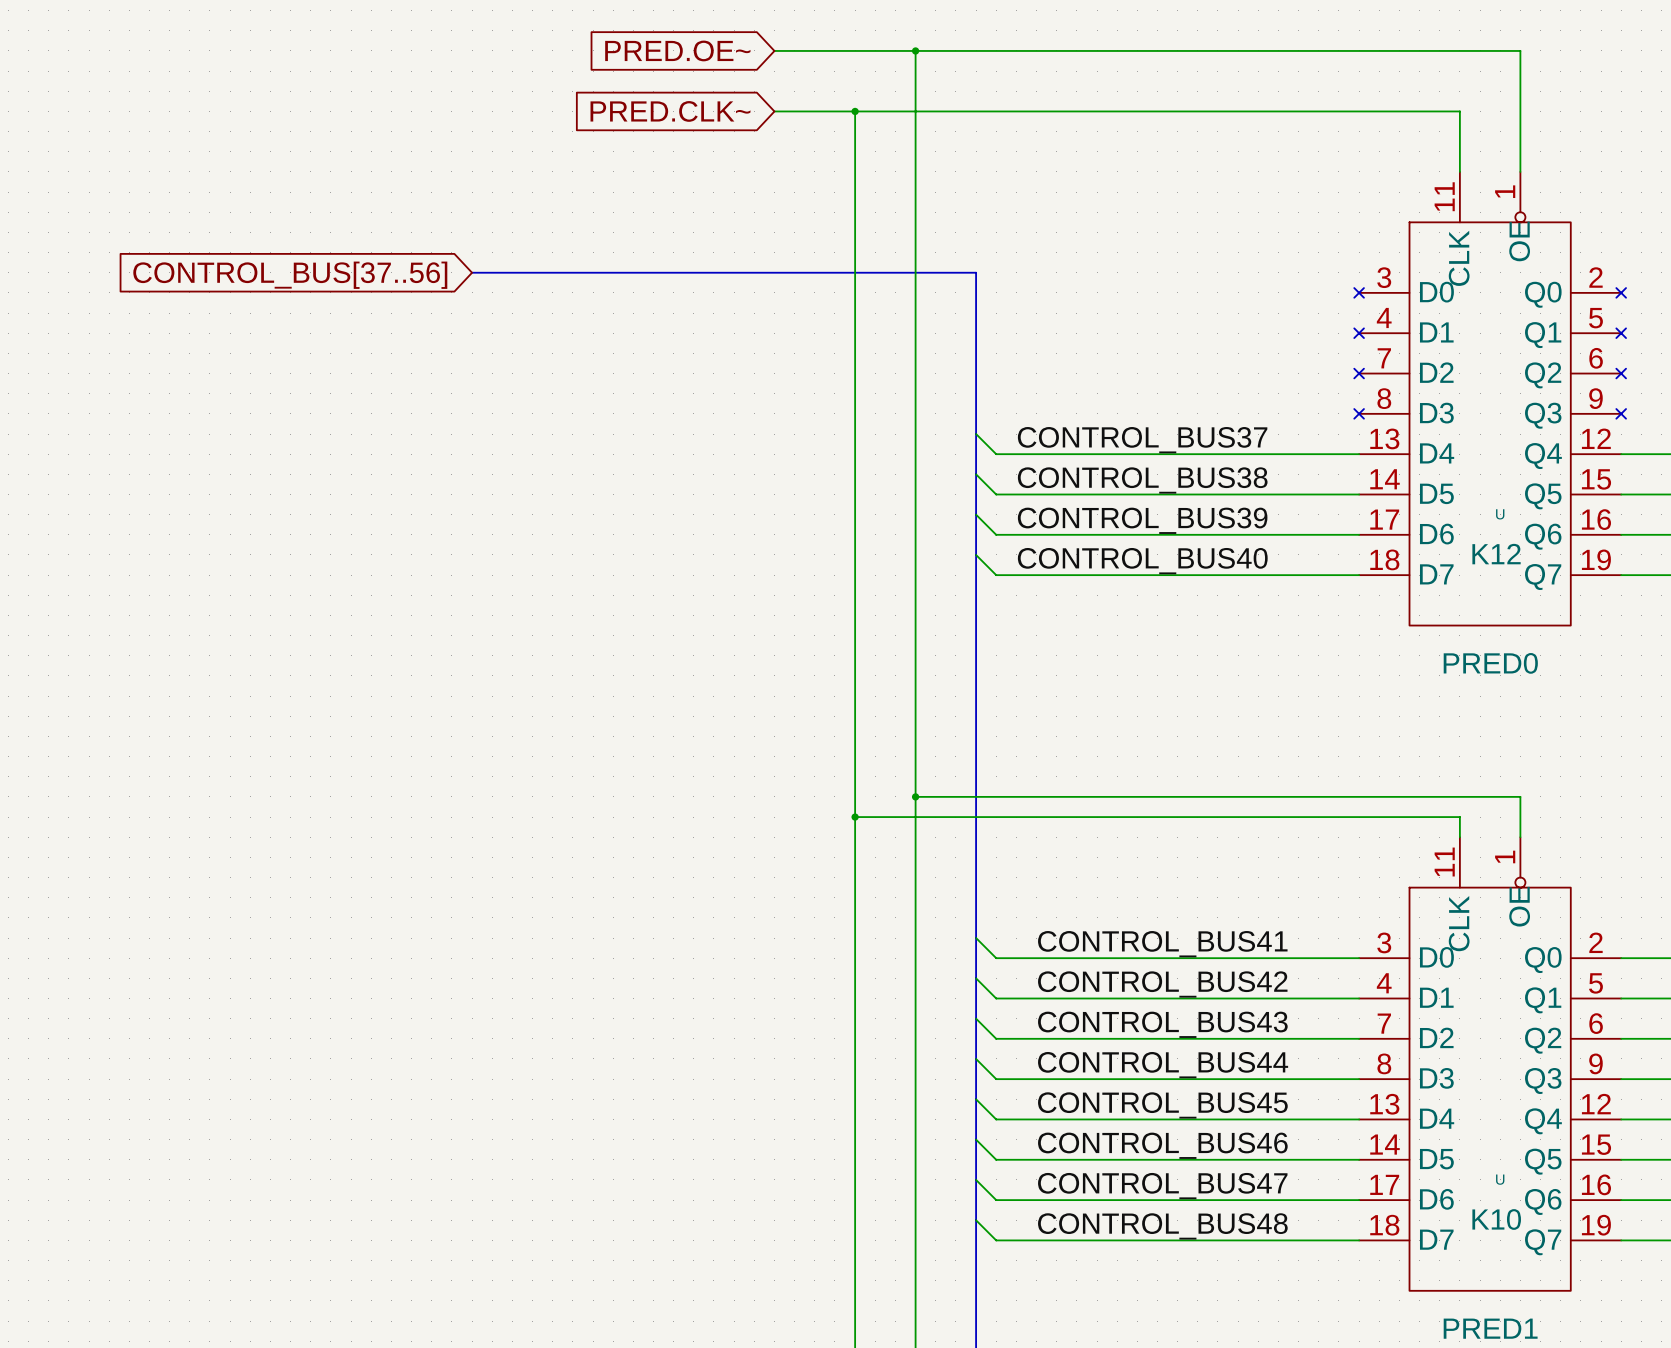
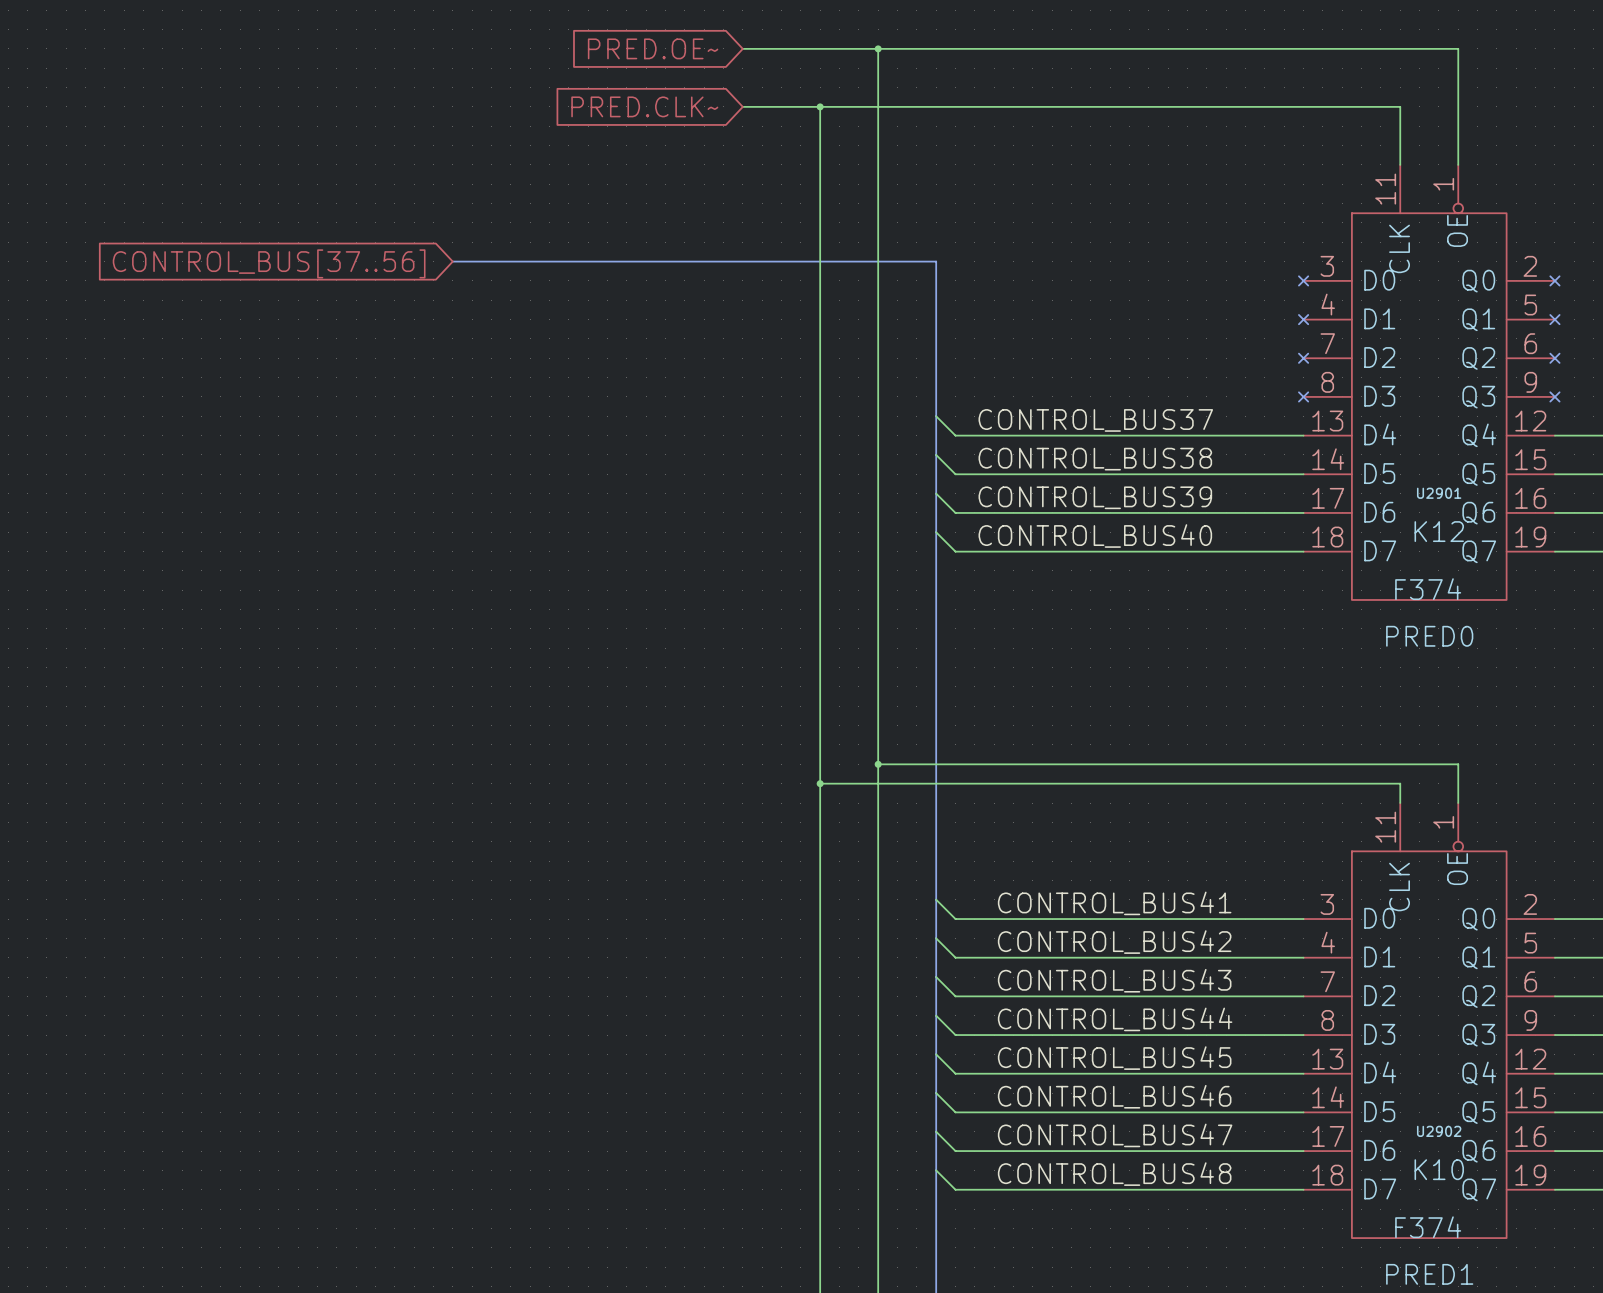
U name: U (1500, 514) -> U2901 (1439, 493)
U value: none -> F374 (1428, 589)
U name: U (1500, 1179) -> U2902 (1439, 1131)
U value: none -> F374 (1428, 1227)

